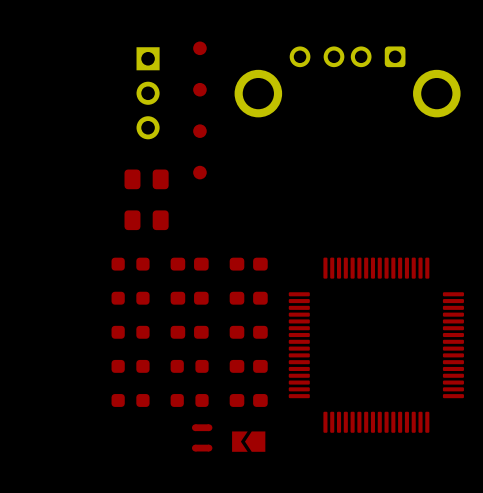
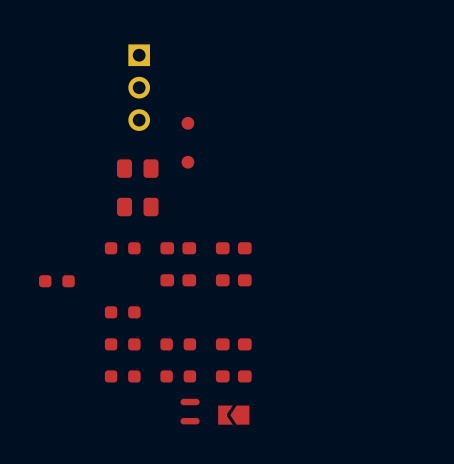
part: (199, 48) -> none
part: (347, 81) -> none
part: (199, 89) -> none
part position: (130, 298) -> (56, 281)
part: (189, 332) -> none
part: (248, 332) -> none
part: (376, 345) -> none

